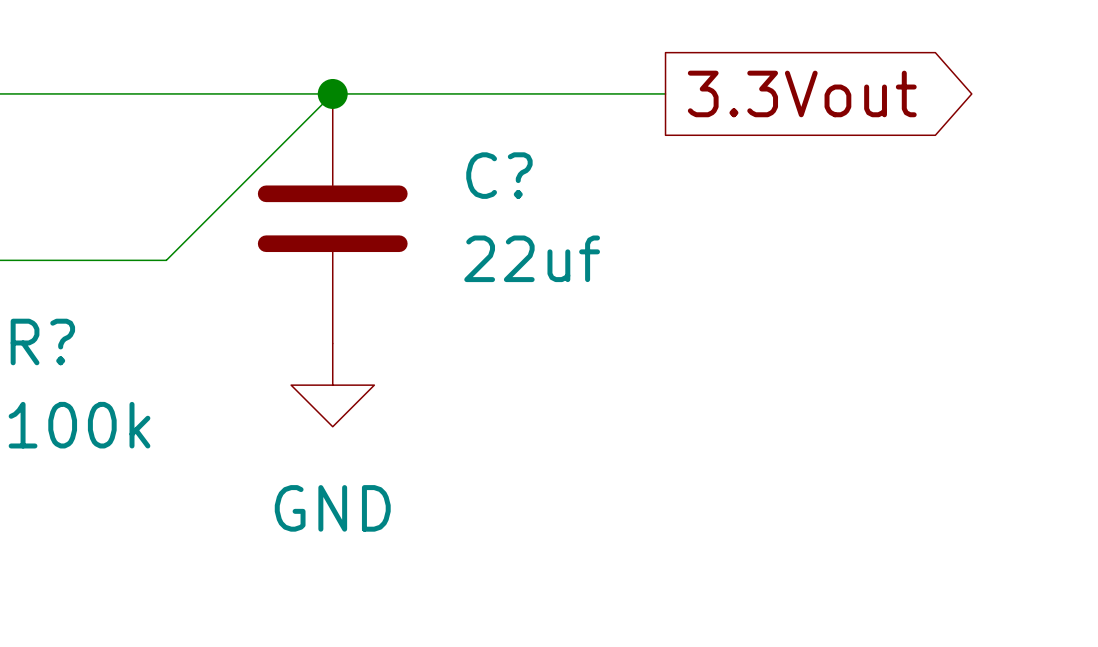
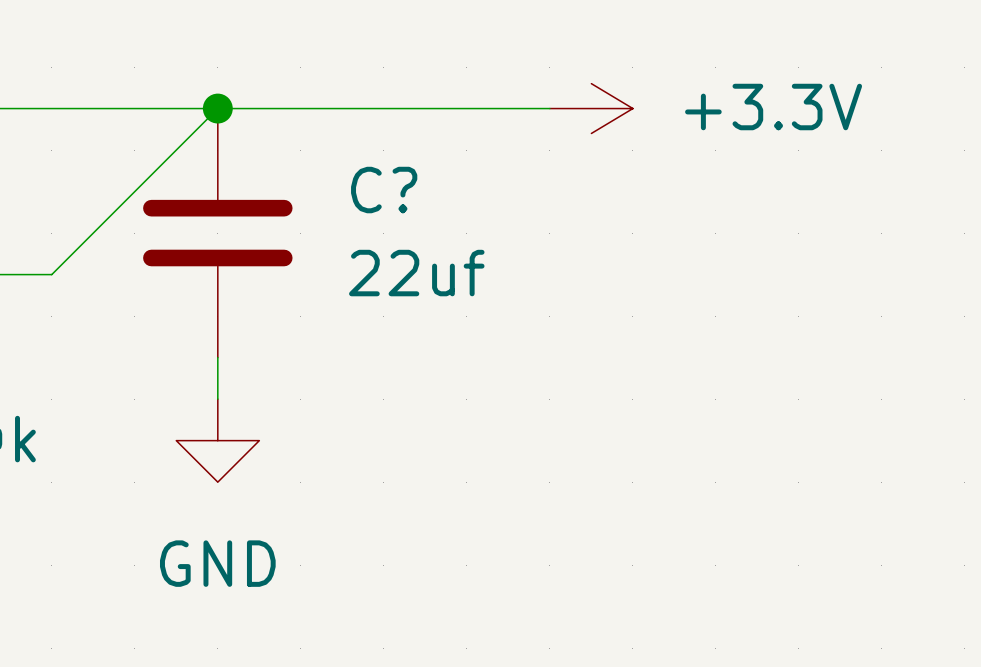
power symbol: none -> +3.3V (591, 108)
global label: 3.3Vout (802, 93) -> none
power symbol position: GND (332, 385) -> GND (217, 440)

